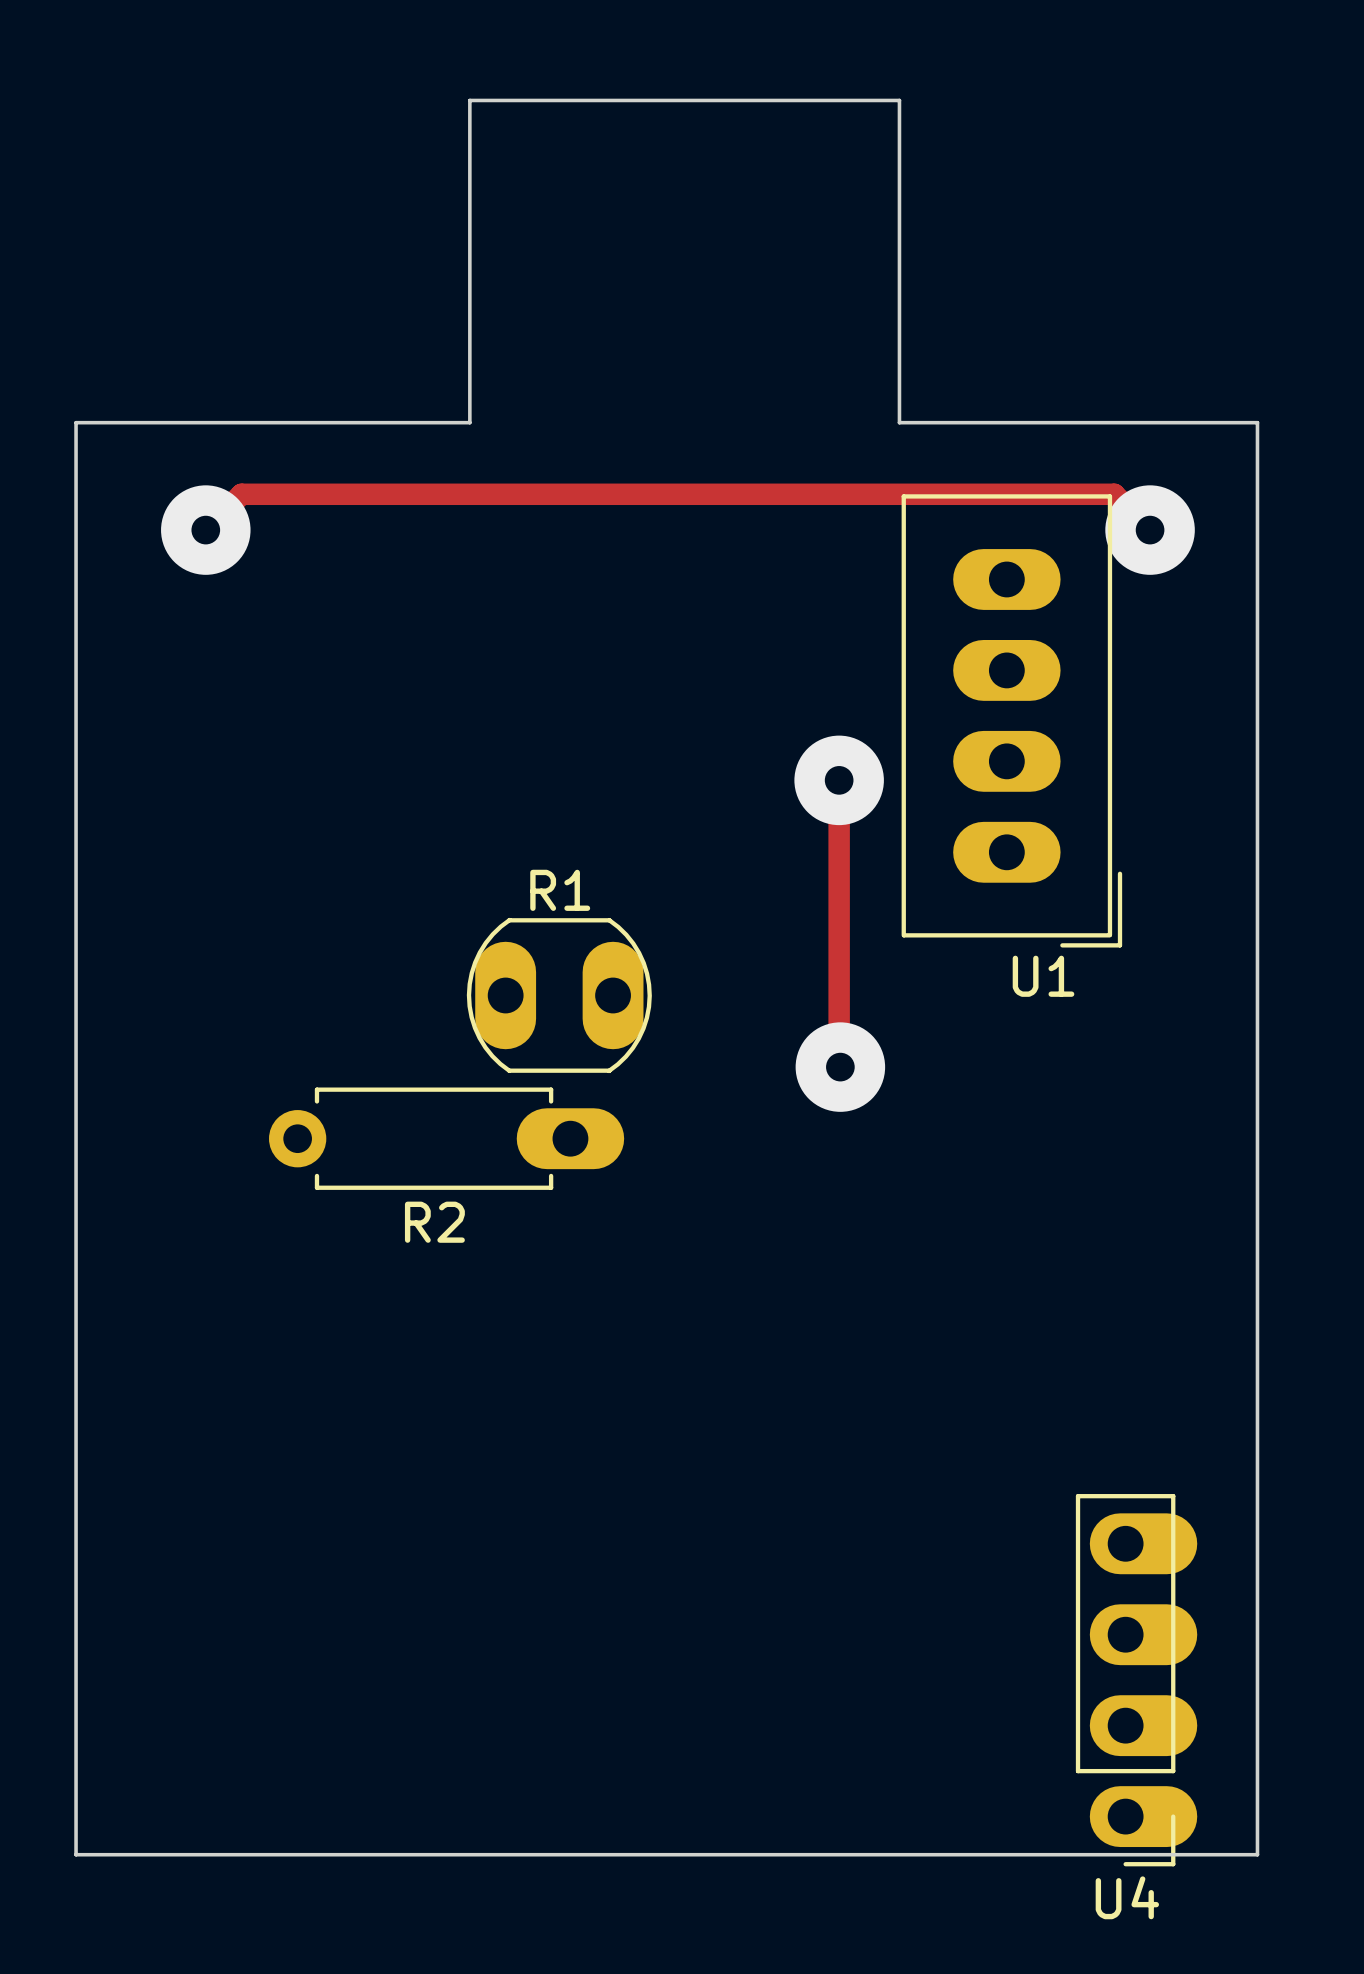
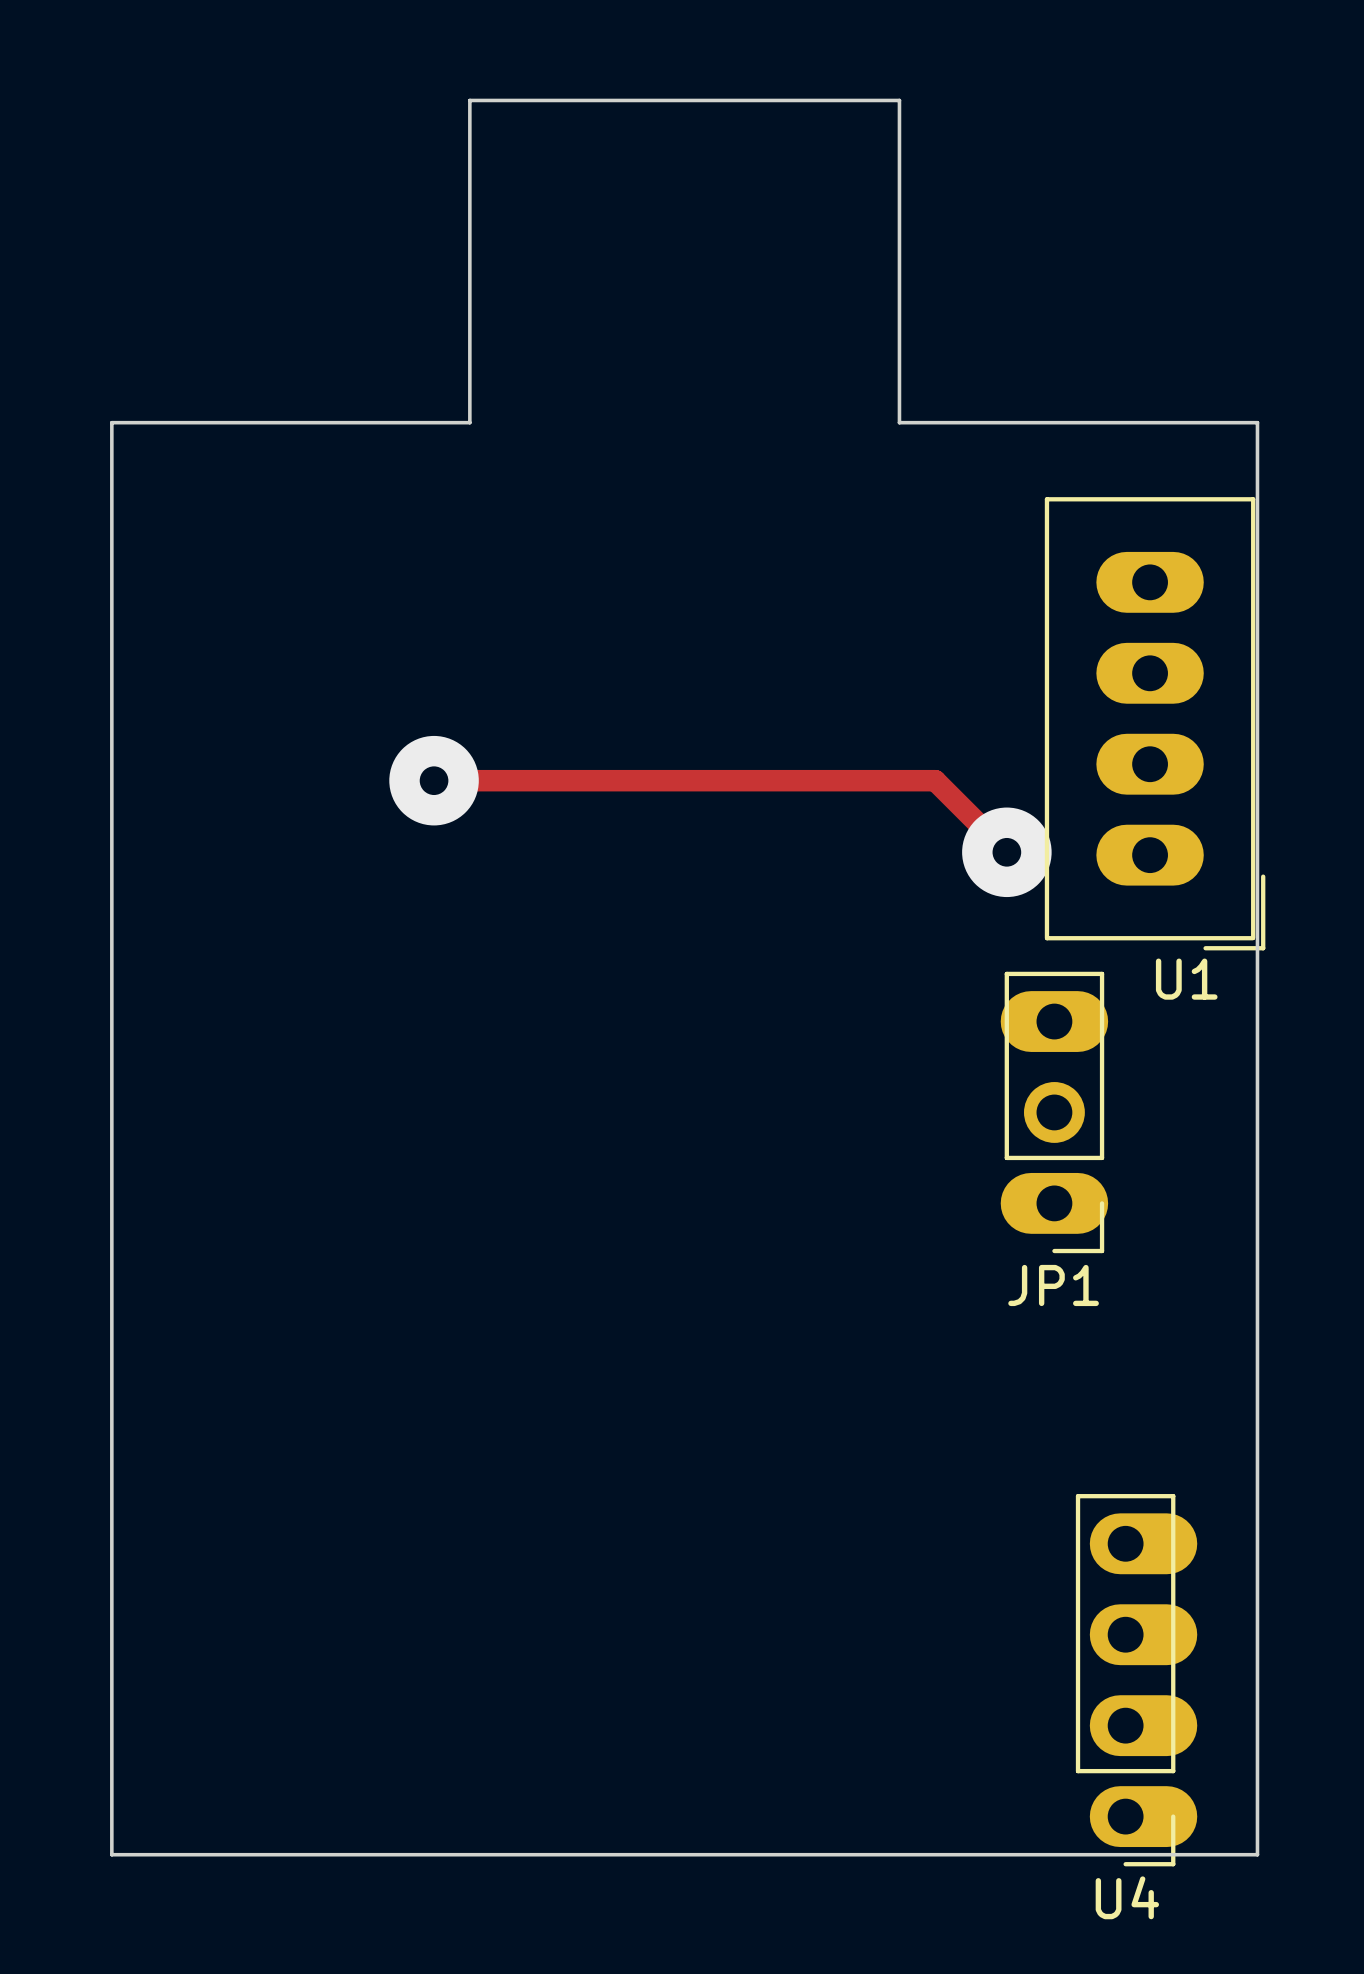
board edge: (111, 422) (76, 422) (76, 1854) (111, 1854) -> (111, 422) (111, 1854)
track: (205, 530) (241, 494) (1114, 494) (1150, 530) -> none
via: (205, 530) -> none
via: (1150, 530) -> none
U1 position: (1011, 720) -> (1155, 723)
track: none -> (434, 780) (935, 780) (1006, 852)
via: none -> (434, 780)
track: (839, 780) (840, 1067) -> none
via: (839, 780) -> none
via: none -> (1006, 852)
R1: (559, 995) -> none
via: (840, 1067) -> none
JP1: none -> (1054, 1112)
R2: (446, 1138) -> none

